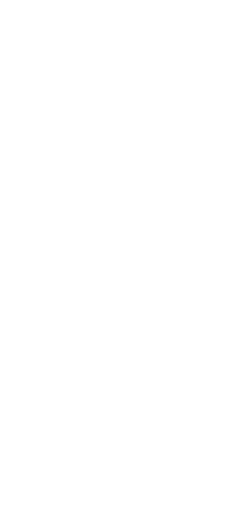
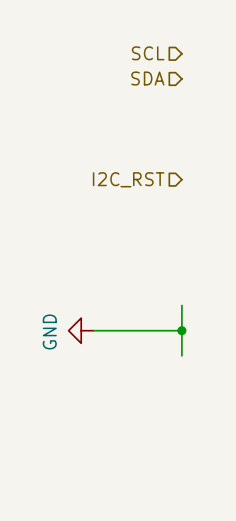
hierarchical label: none -> SCL (148, 53)
hierarchical label: none -> SDA (147, 78)
hierarchical label: none -> I2C_RST (128, 179)
wire: none -> (181, 305) (181, 355)
power symbol: none -> GND (81, 330)
wire: none -> (93, 330) (181, 330)
junction: none -> (181, 330)

